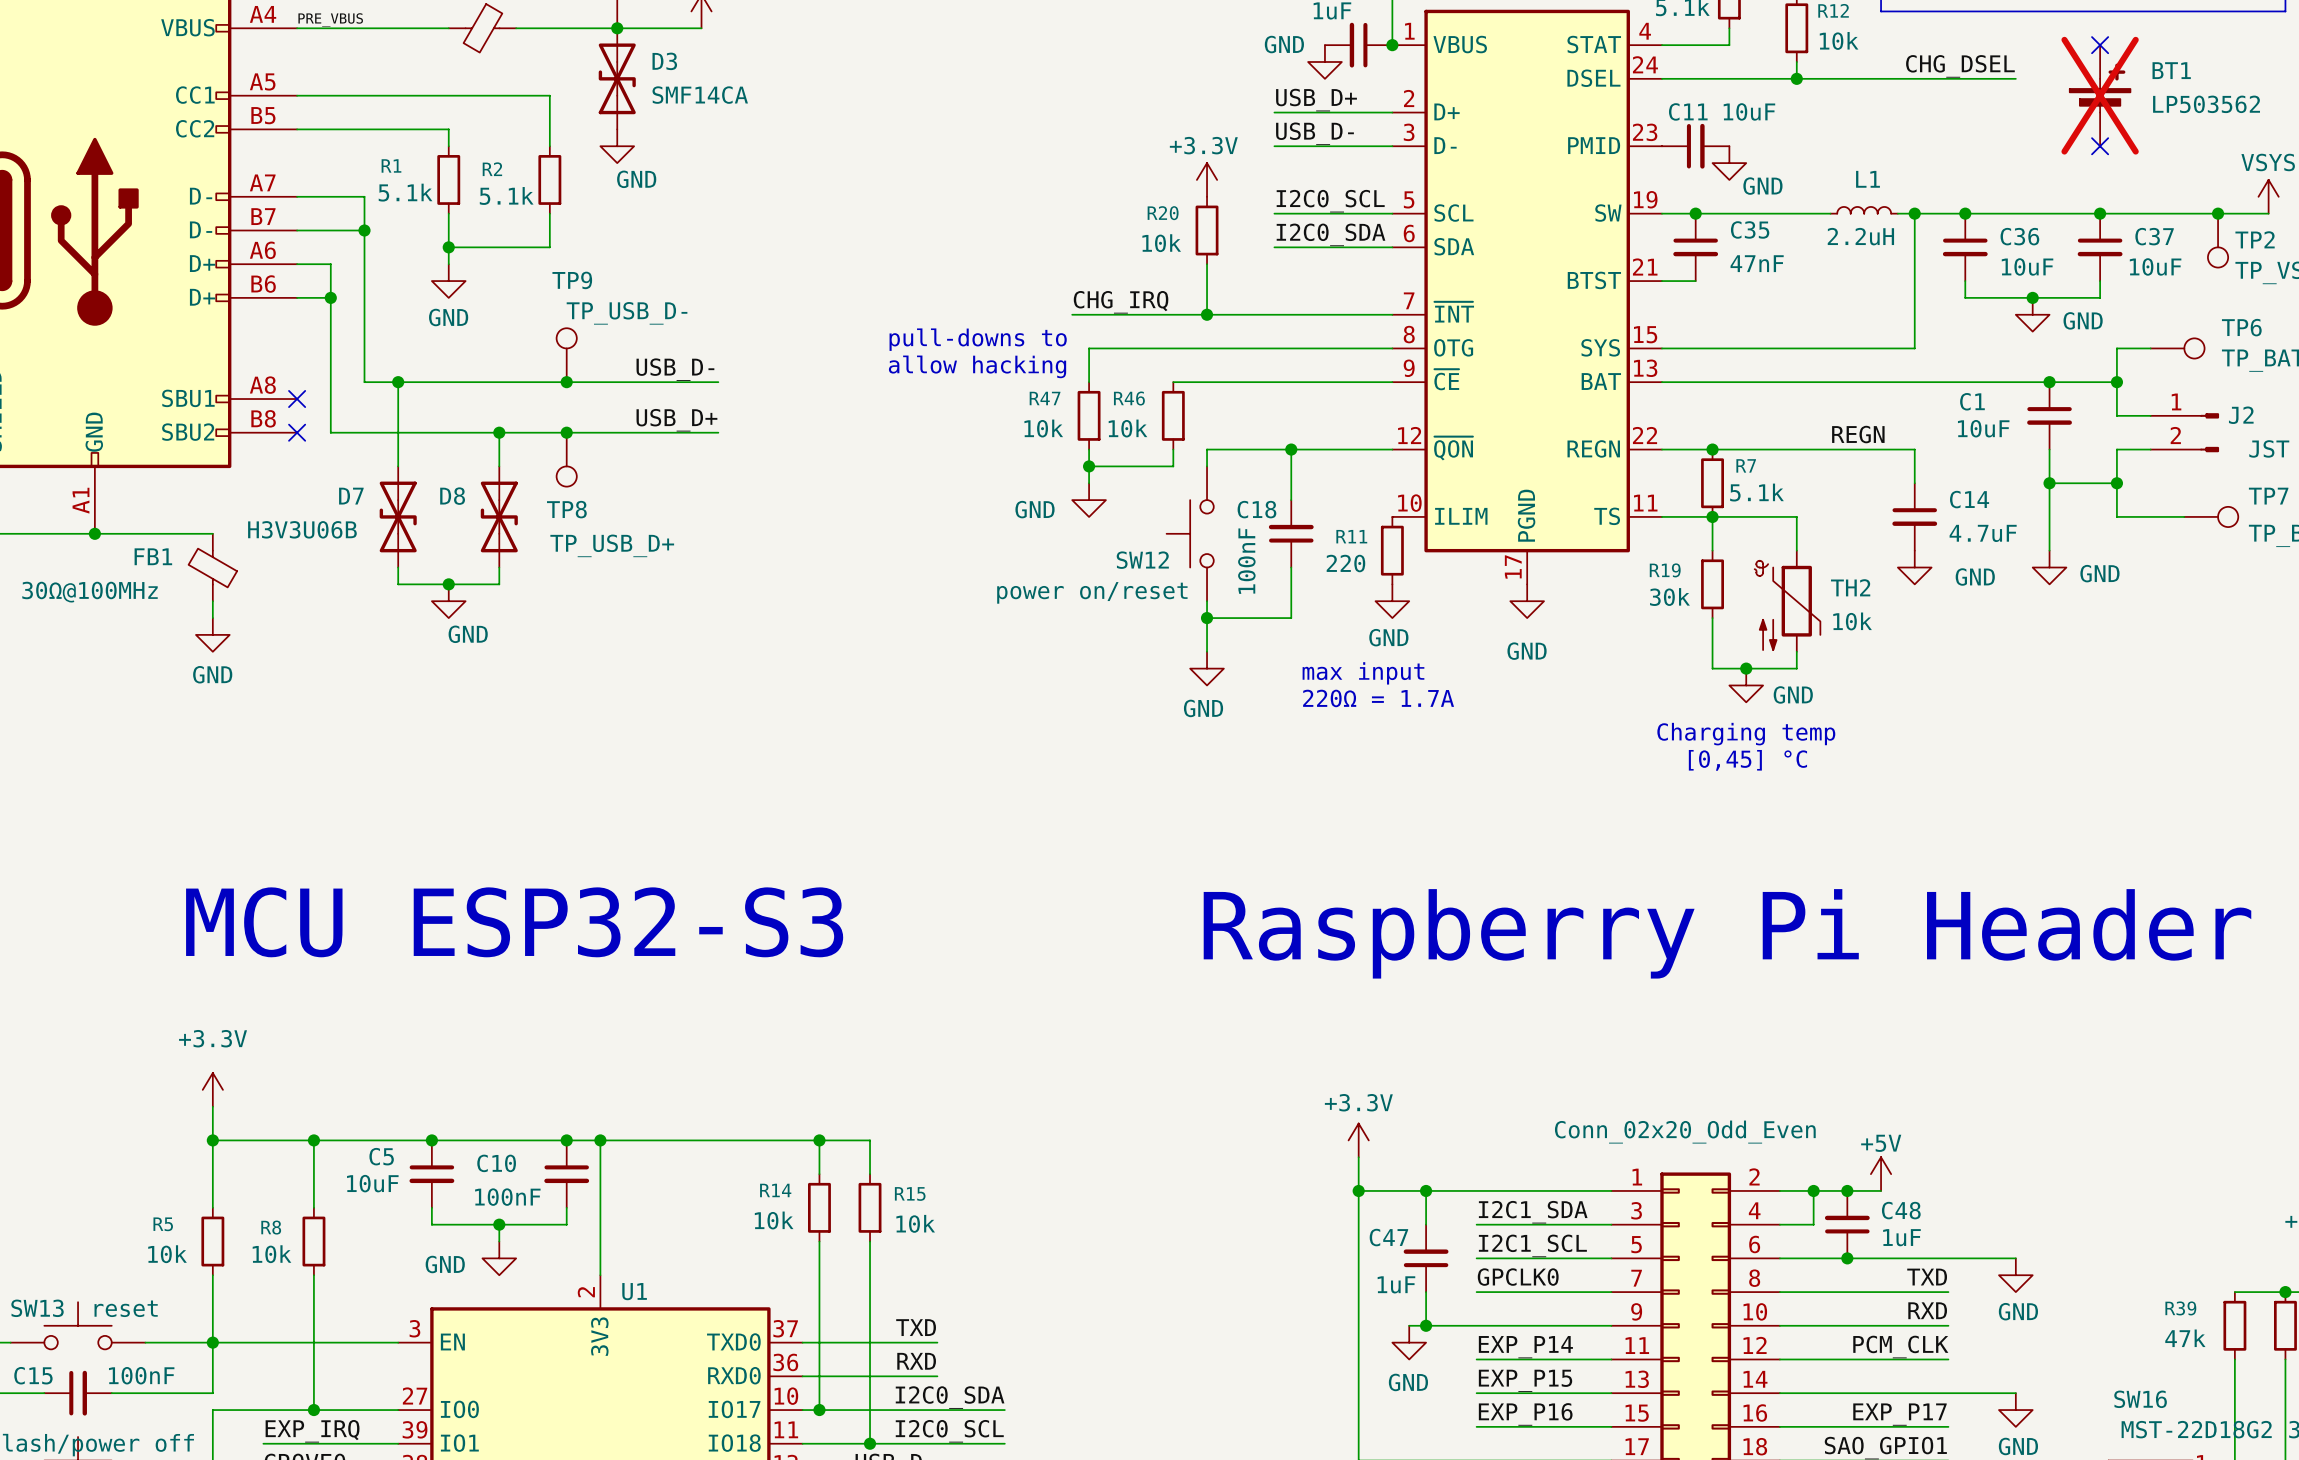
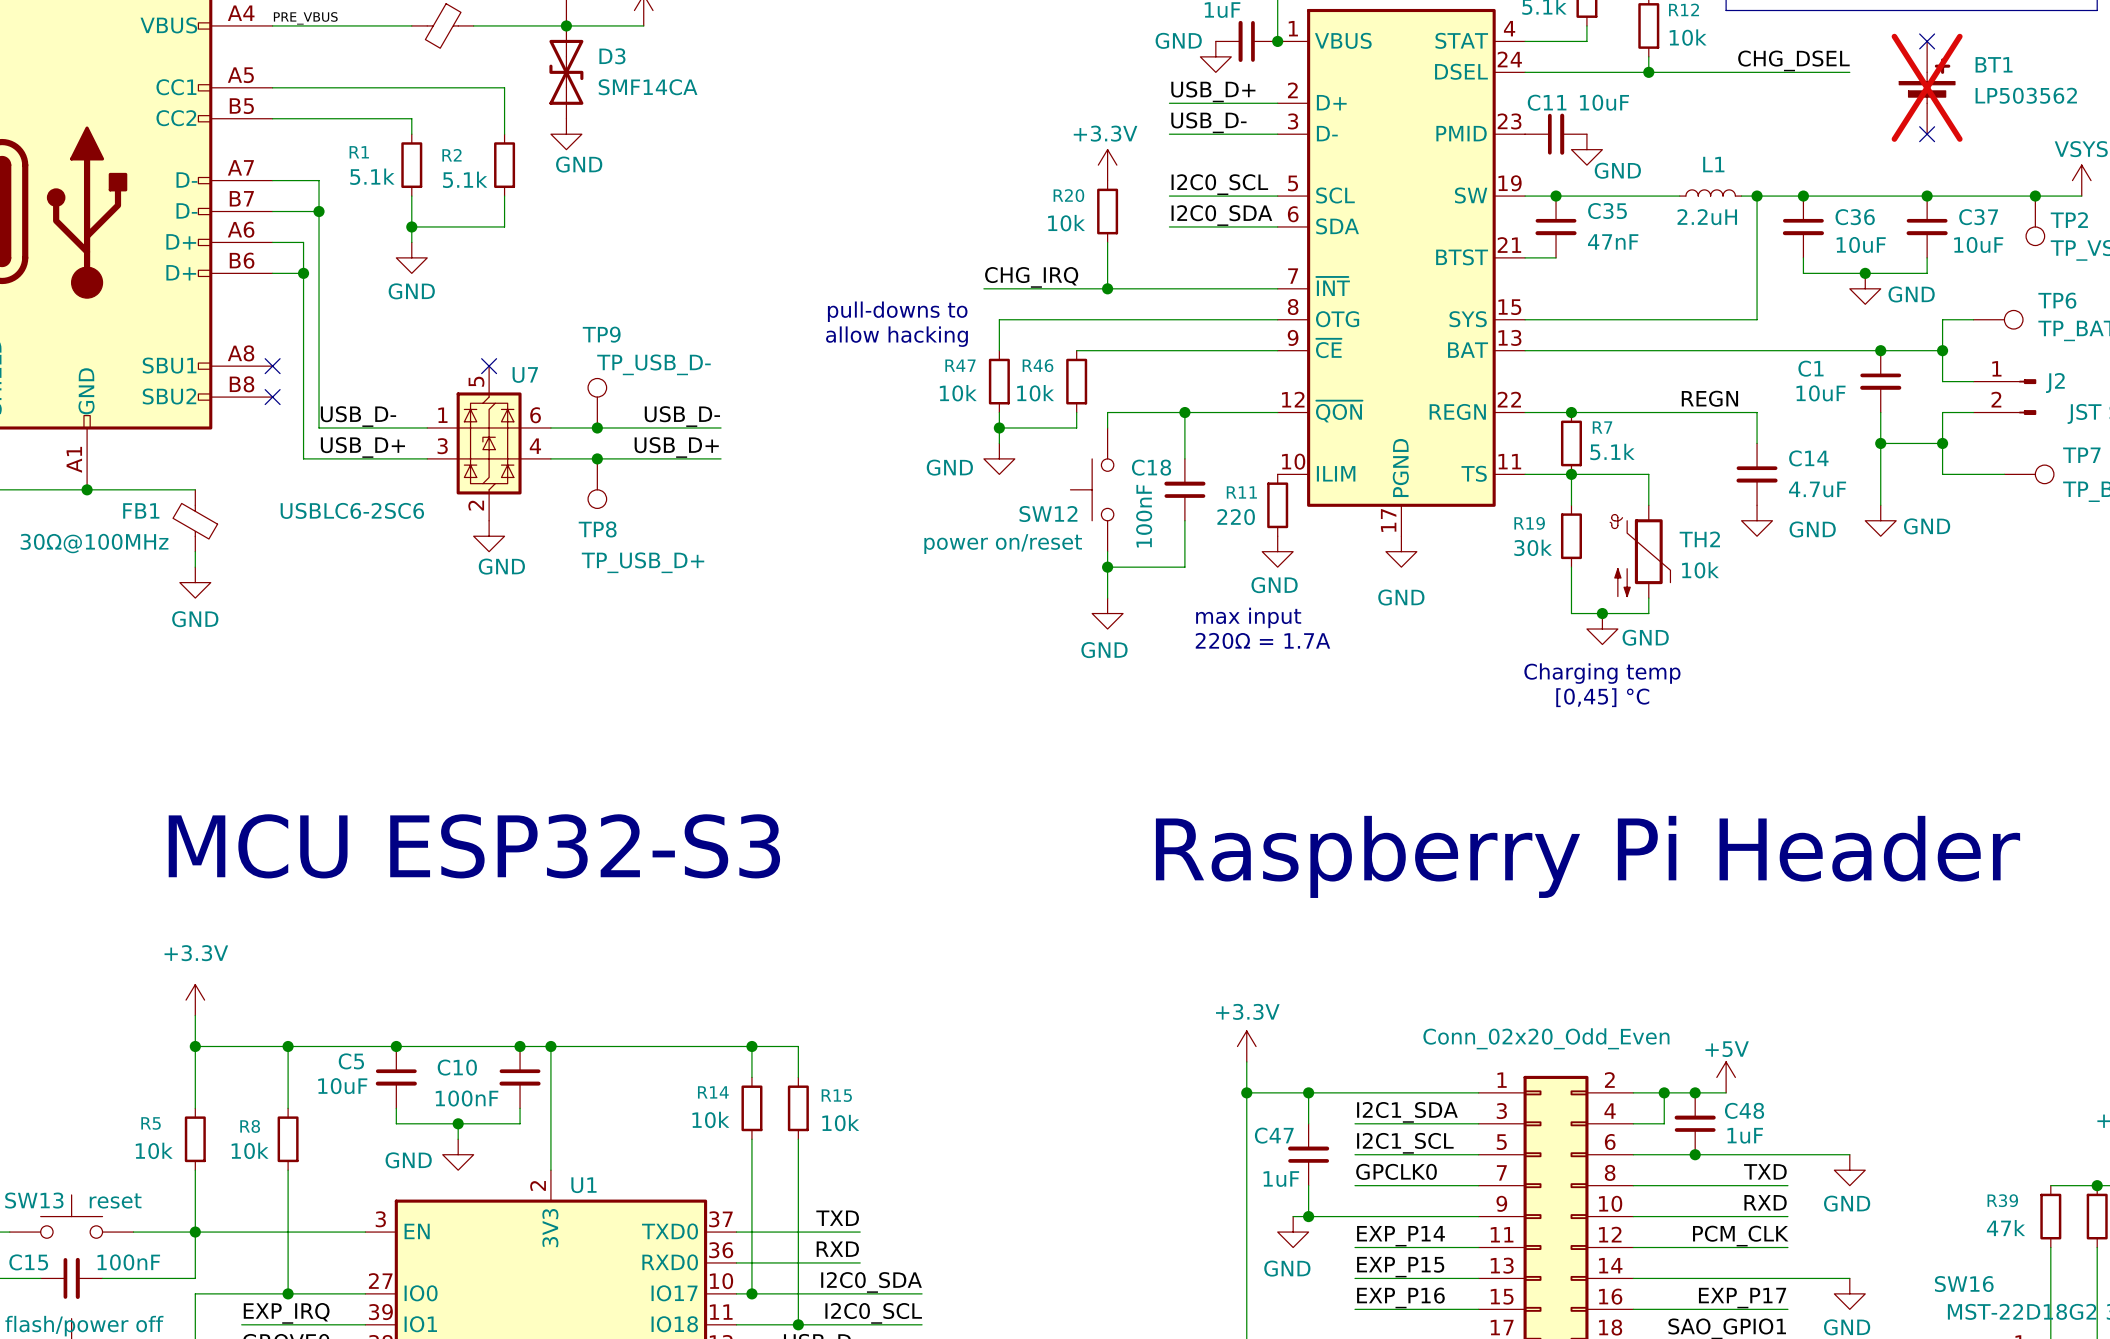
wire: (347, 196) (364, 196) (364, 382) (718, 382) -> (319, 180) (319, 427) (427, 427)
wire: (347, 230) (364, 230) -> none
junction position: (364, 230) -> (319, 211)
TP9 position: (566, 355) -> (597, 403)
label position: USB_D- (675, 369) -> USB_D- (682, 416)
wire: (398, 382) (398, 466) -> none
junction: (398, 382) -> none
junction: (566, 382) -> none
no-connect mark: none -> (489, 366)
label position: USB_D+ (676, 420) -> USB_D+ (676, 447)
wire: (330, 432) (718, 432) -> (303, 397) (303, 458) (427, 458)
junction: (499, 432) -> none
junction: (566, 432) -> none
label: none -> USB_D- (358, 416)
TP8 position: (566, 459) -> (597, 483)
wire: none -> (550, 427) (721, 427)
junction: none -> (597, 427)
U7: none -> USBLC6-2SC6 (489, 443)
label: none -> USB_D+ (362, 447)
wire: none -> (550, 458) (721, 458)
junction: none -> (597, 458)
D7: H3V3U06B (398, 516) -> none
D8: (499, 516) -> none
wire: (398, 567) (398, 584) (499, 584) (499, 567) -> none
junction: (448, 584) -> none
power symbol position: GND (448, 601) -> GND (489, 536)

